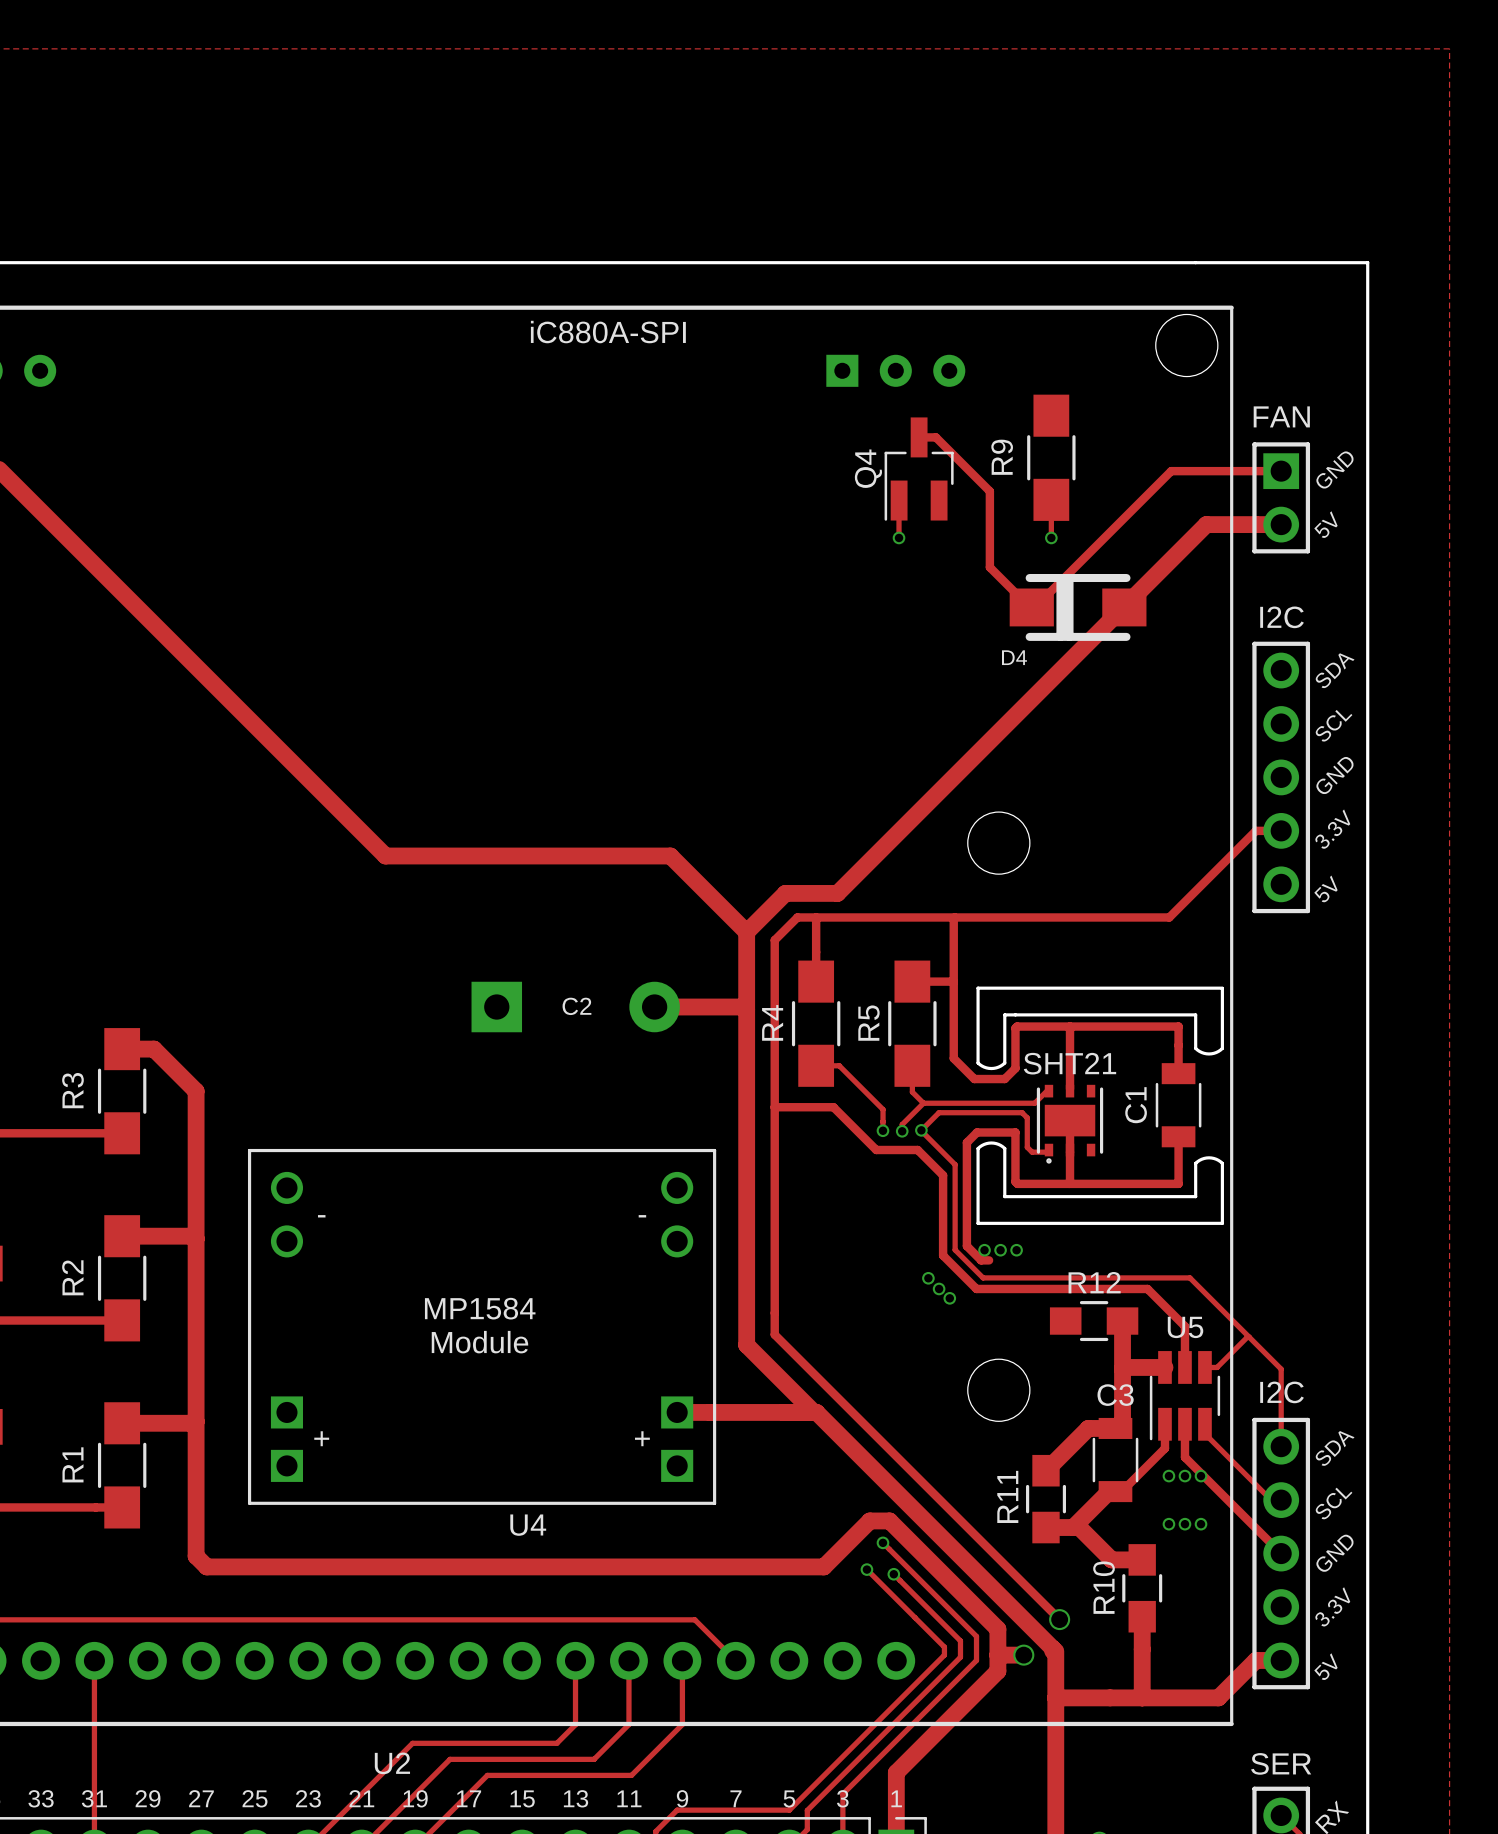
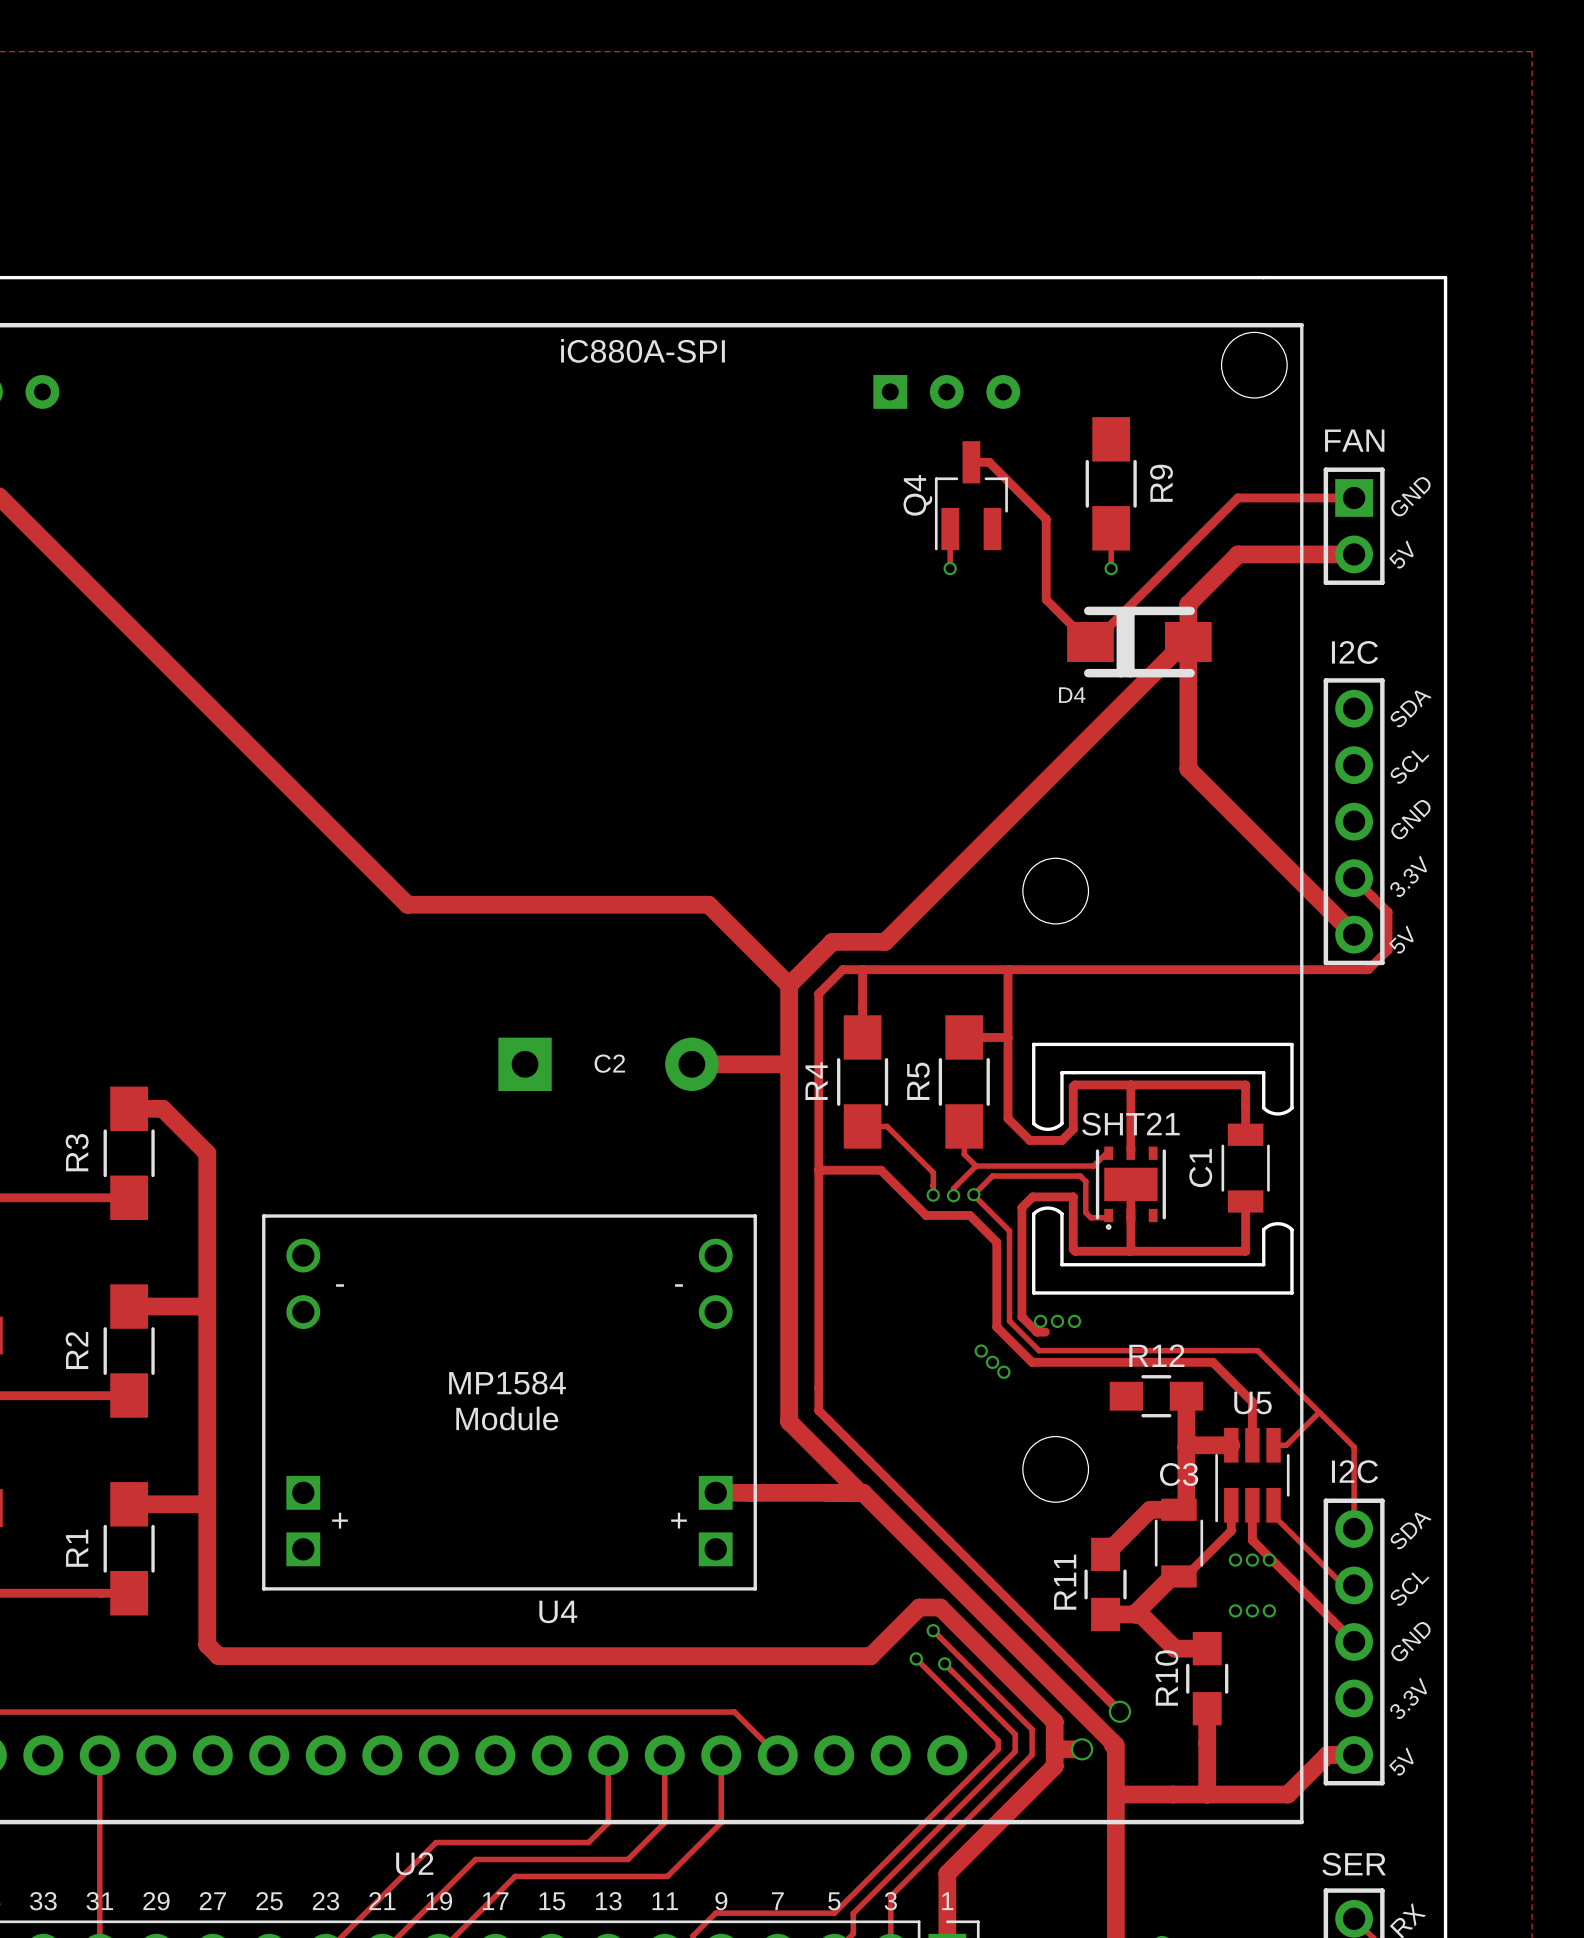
R9 name position: R9 (1002, 457) -> R9 (1161, 483)
track: (1206, 524) (837, 893) (785, 893) -> (1188, 642) (1185, 642) (885, 941) (832, 941) (830, 944)
track: none -> (1275, 554) (1238, 554) (1188, 604) (1188, 768) (1354, 934)
track: (1281, 830) (1255, 830) (1169, 917) -> (1354, 878) (1388, 912) (1388, 949) (1368, 969) (1235, 969)

